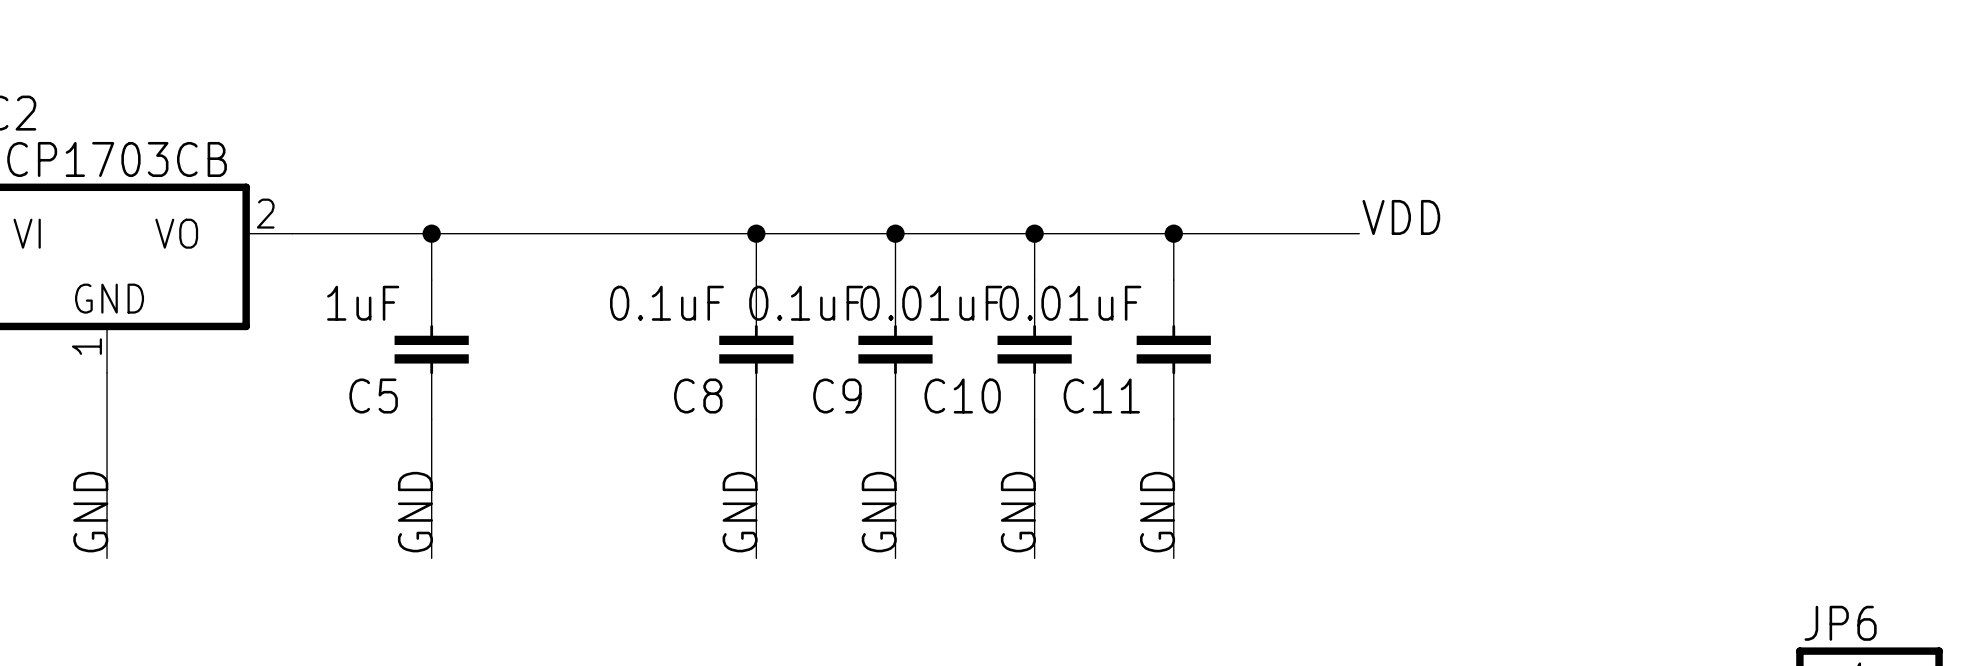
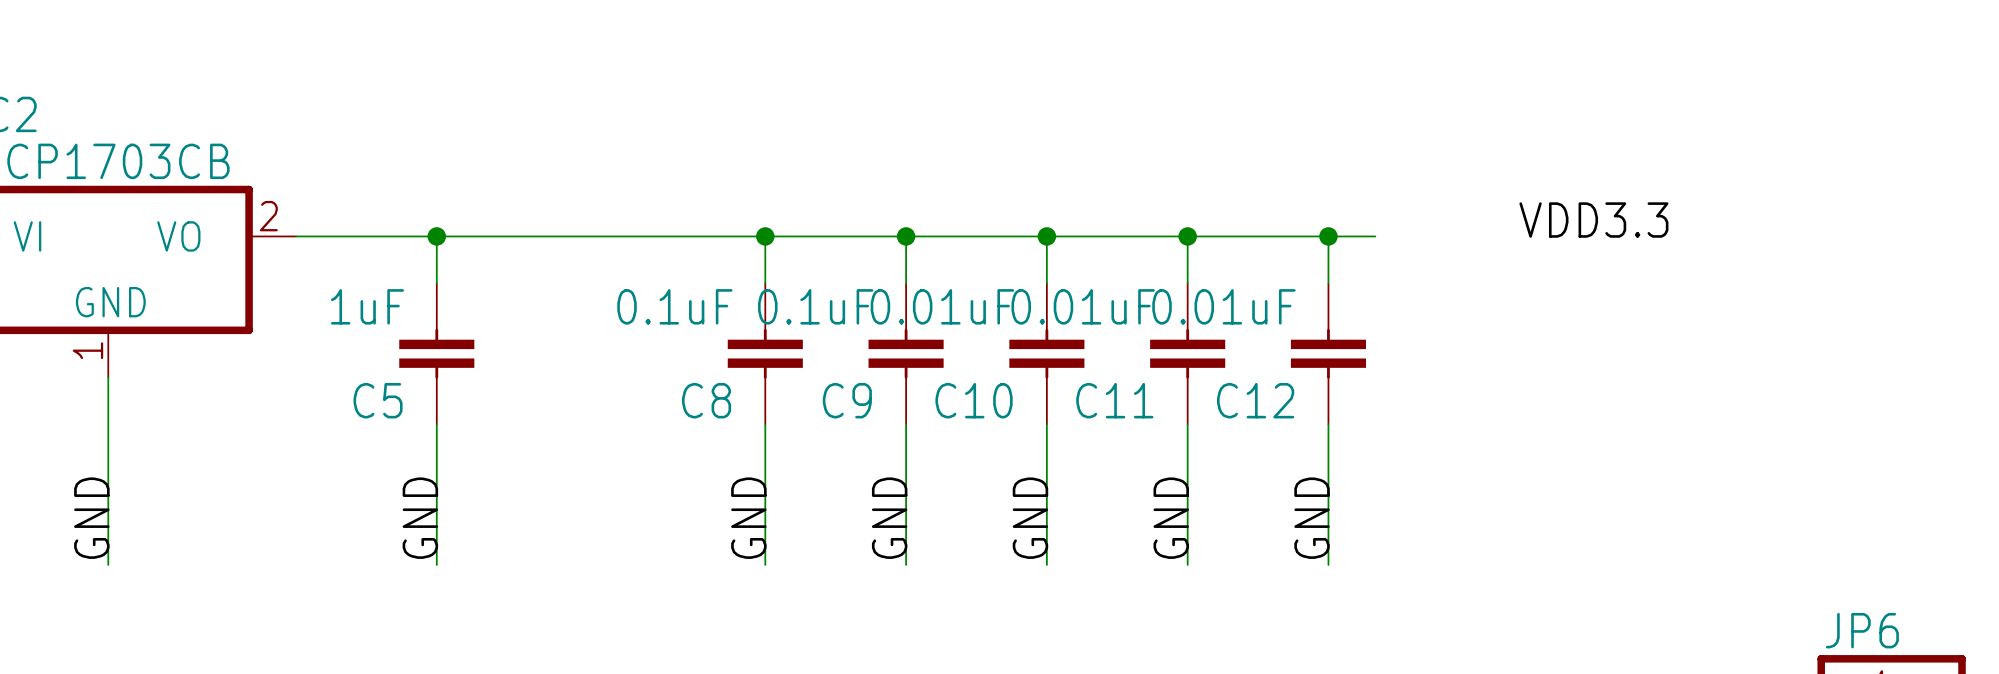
label: VDD (1401, 217) -> none
label: none -> VDD3.3 (1593, 220)
wire: none -> (1328, 236) (1328, 283)
junction: none -> (1328, 236)
C12: none -> 0.01uF (1328, 353)
wire: none -> (1328, 424) (1328, 564)
label: none -> GND (1312, 518)

